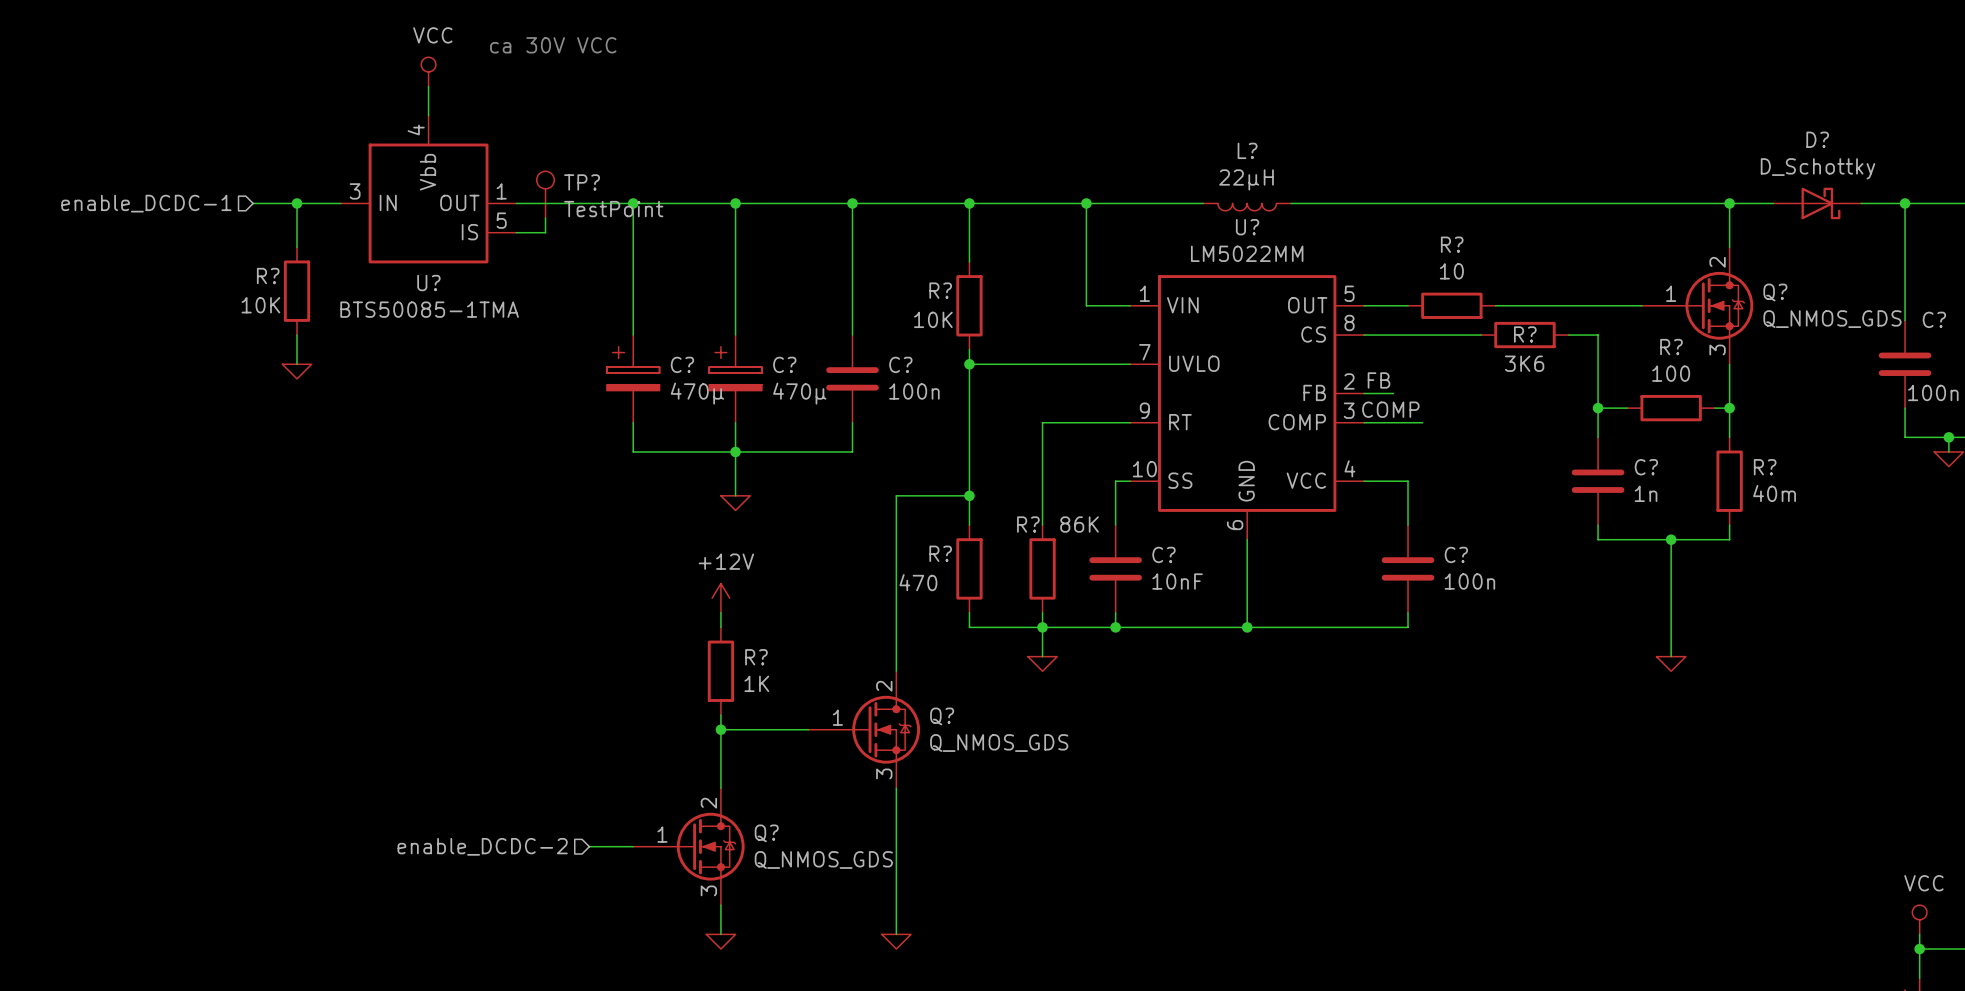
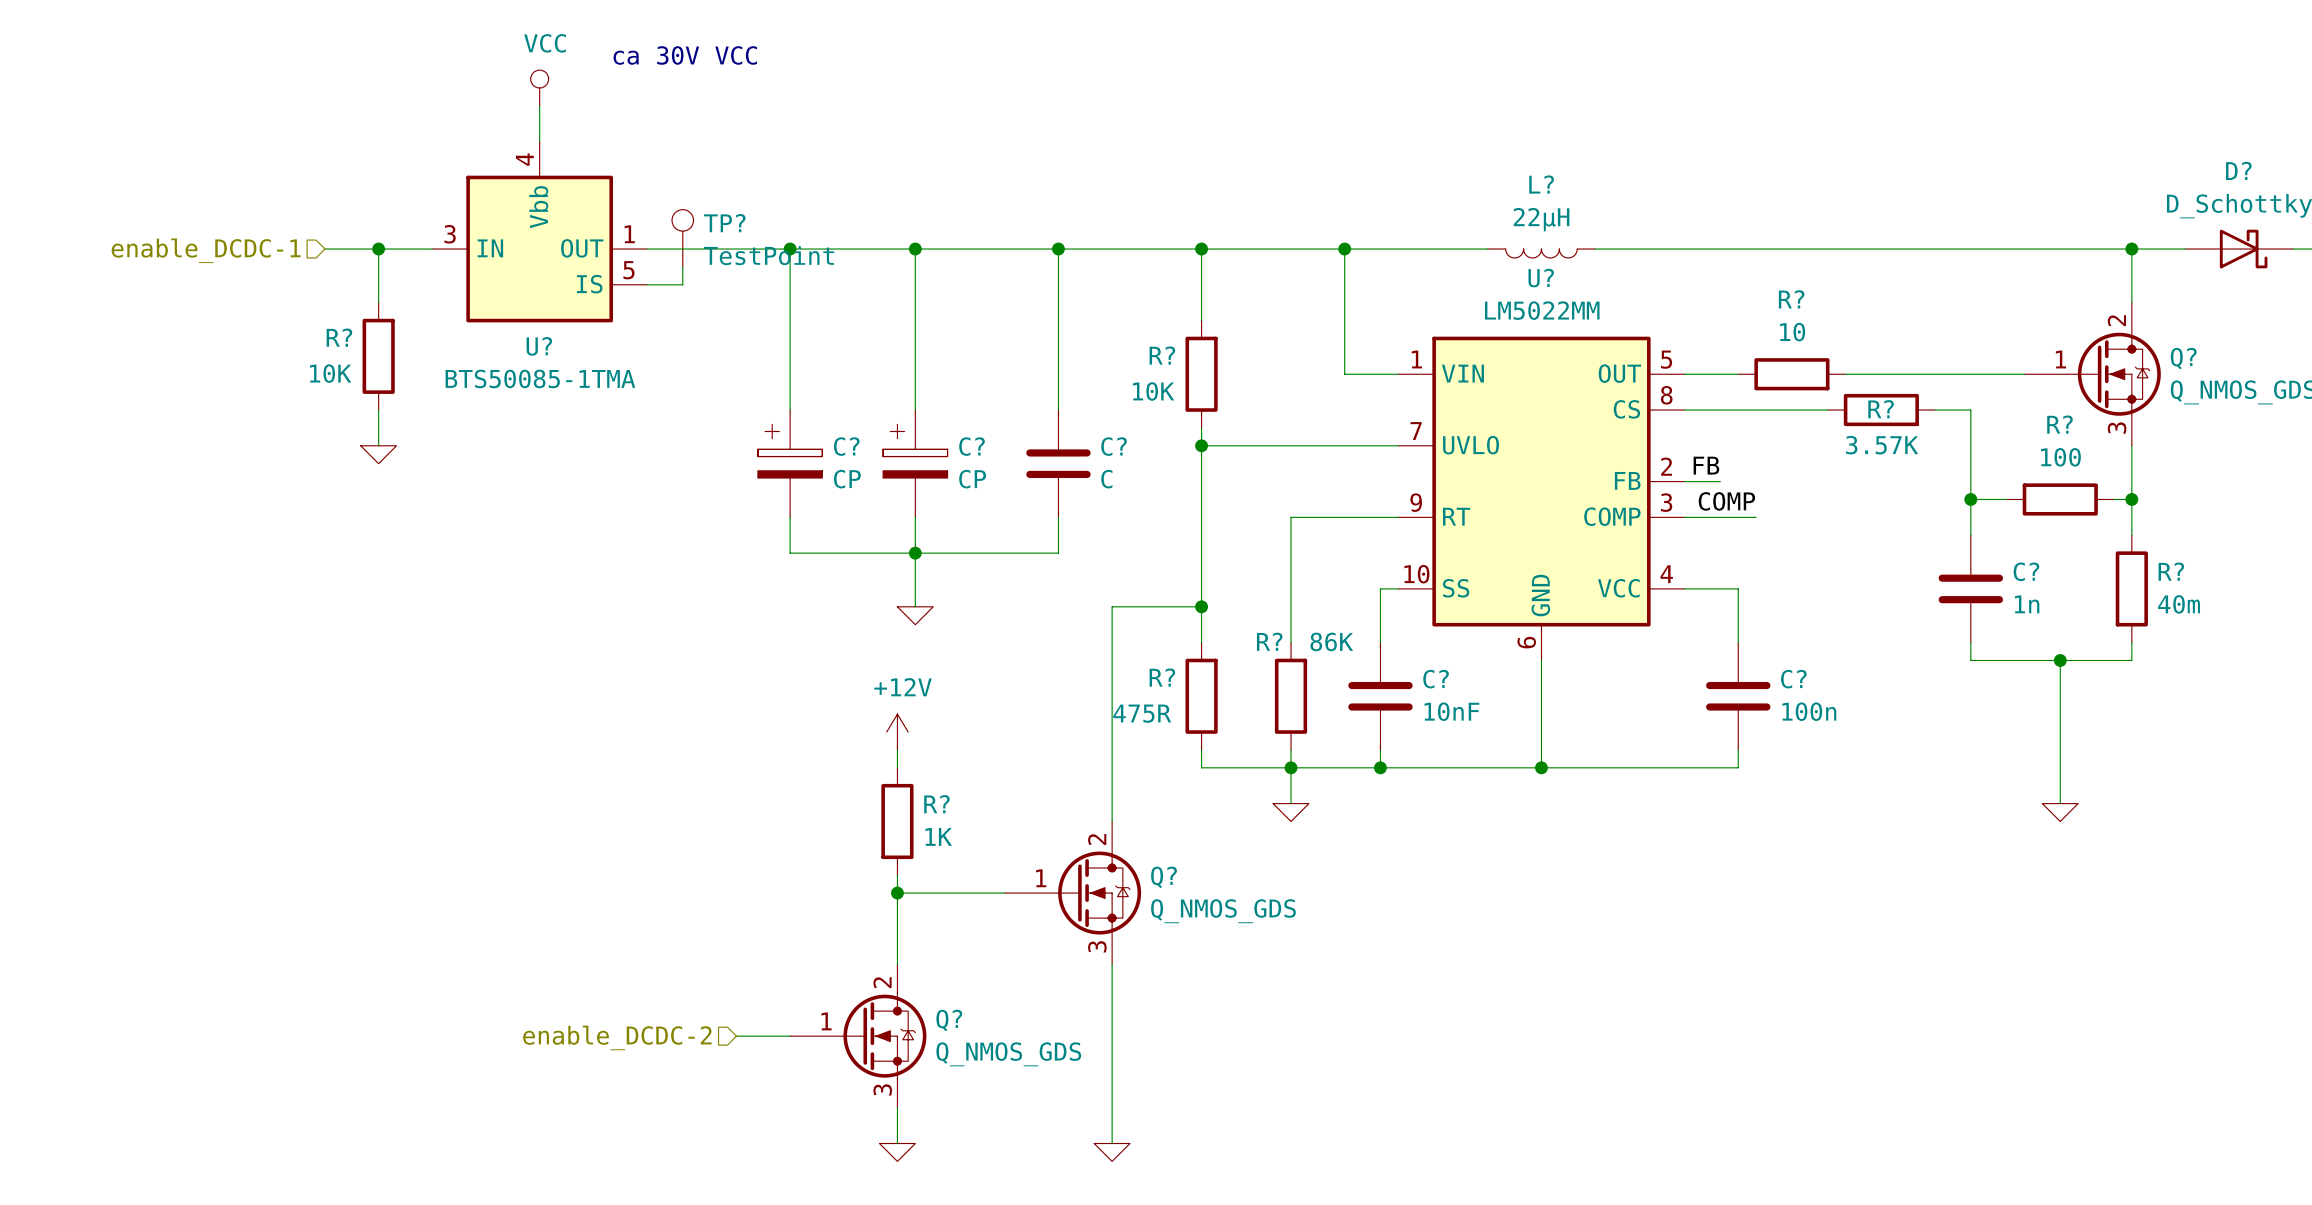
R? value: 3K6 (1524, 363) -> 3.57K (1882, 445)
C? value: 100n (914, 391) -> C (1106, 479)
C? value: 470µ (697, 393) -> CP (847, 479)
C? value: 470µ (799, 393) -> CP (972, 479)
R? value: 470 (918, 582) -> 475R (1142, 713)

